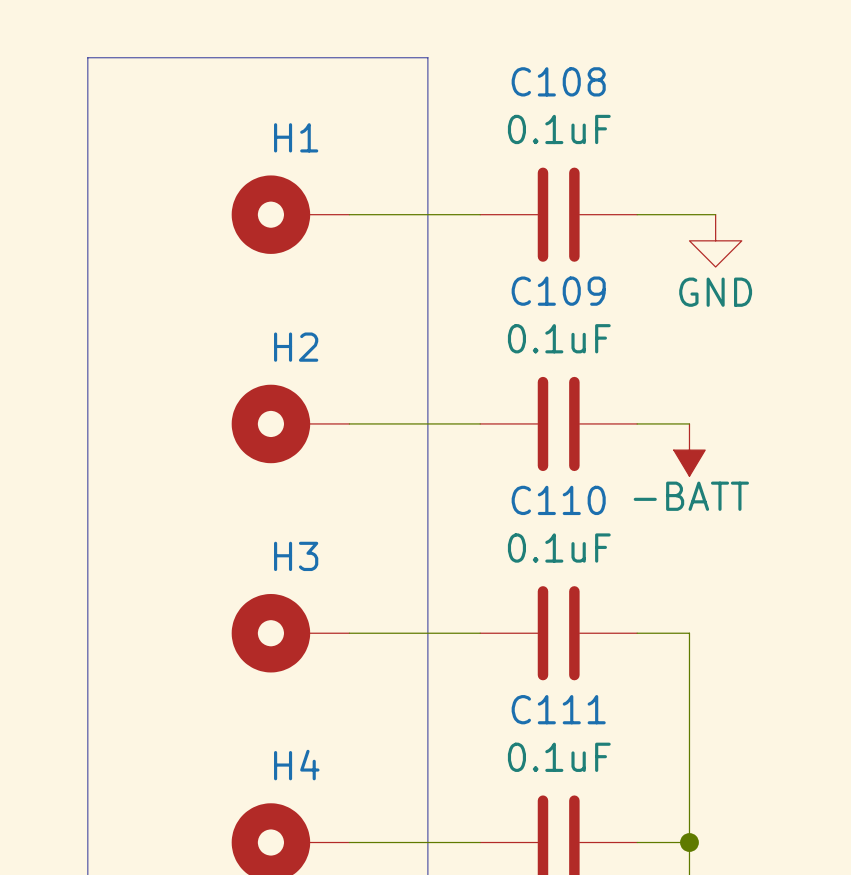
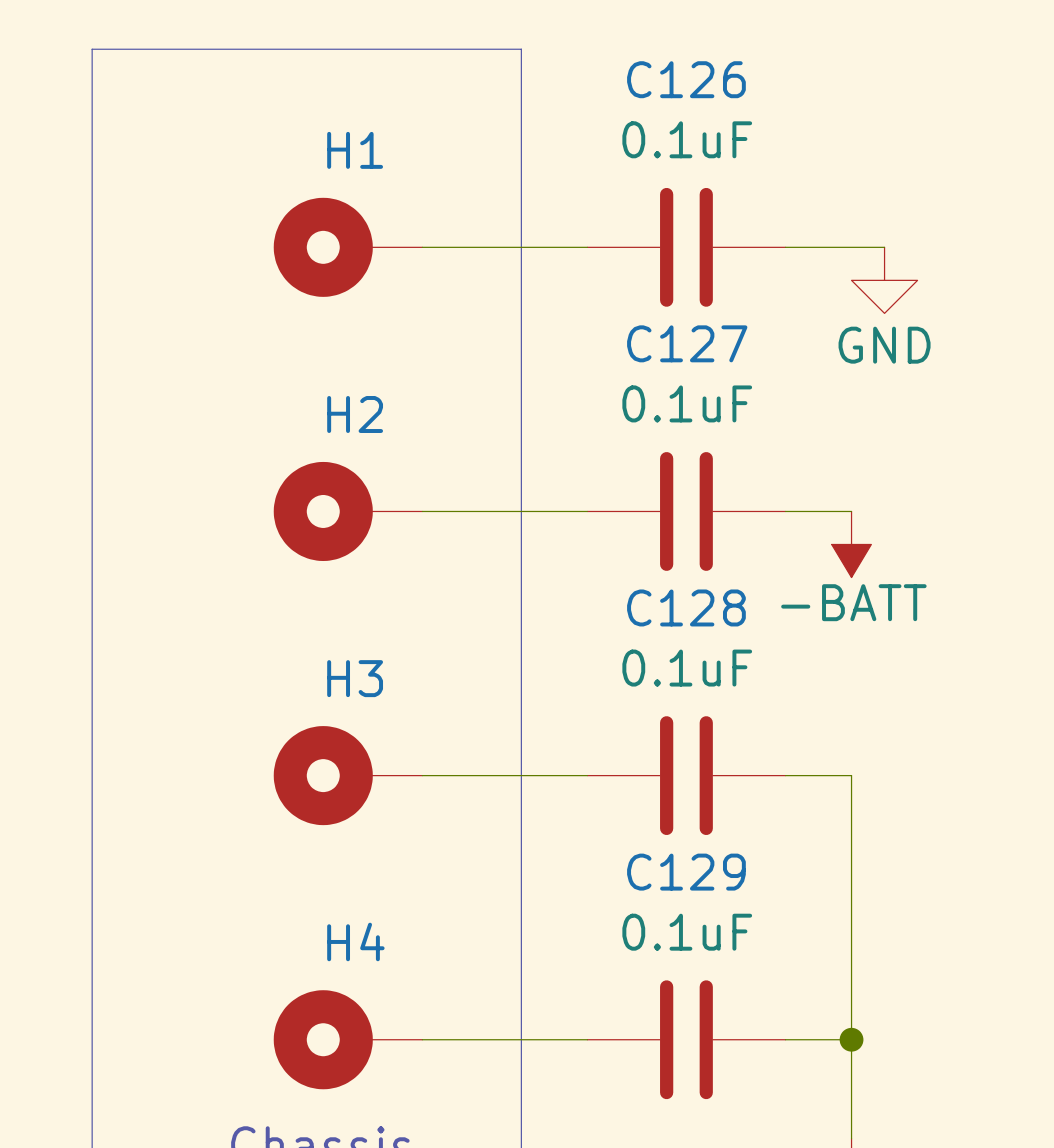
C108 name: C108 (558, 81) -> C126 (686, 79)
C109 name: C109 (558, 291) -> C127 (687, 343)
C110 name: C110 (558, 500) -> C128 (686, 607)
C111 name: C111 (558, 709) -> C129 (686, 872)

